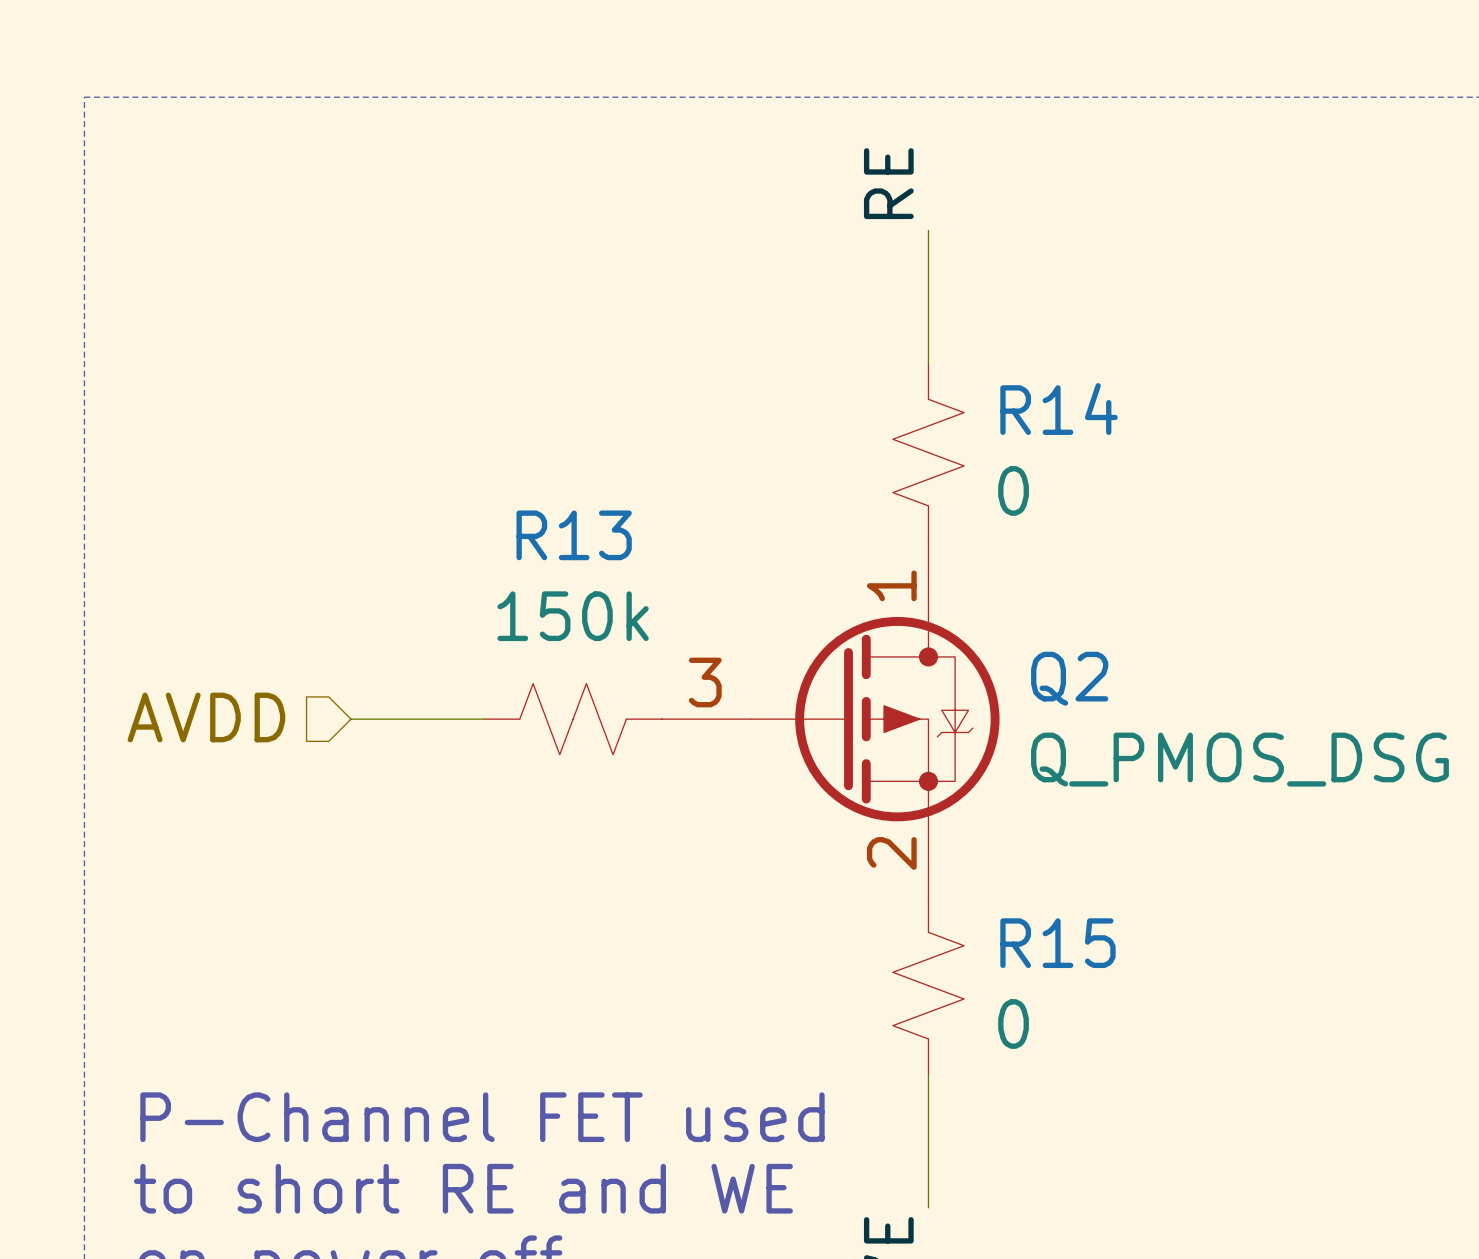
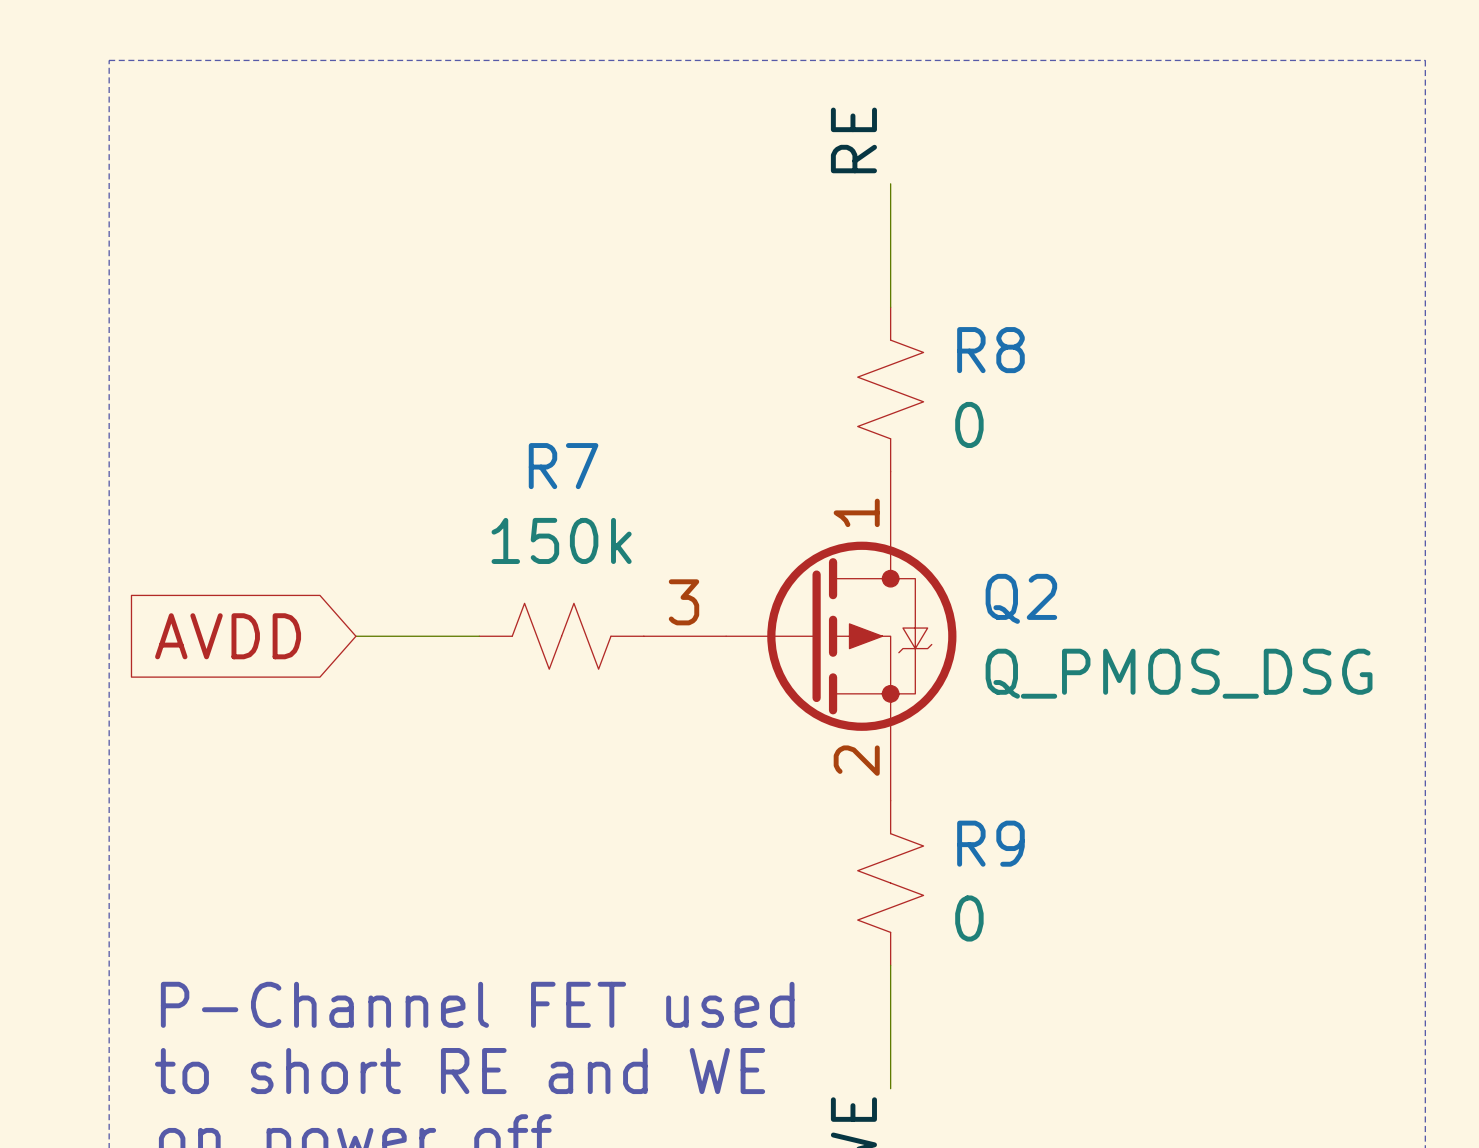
R14 name: R14 (1059, 409) -> R8 (990, 350)
R13 name: R13 (574, 535) -> R7 (563, 466)
hierarchical label: AVDD (206, 717) -> none
global label: none -> AVDD (228, 636)
R15 name: R15 (1057, 943) -> R9 (990, 843)

